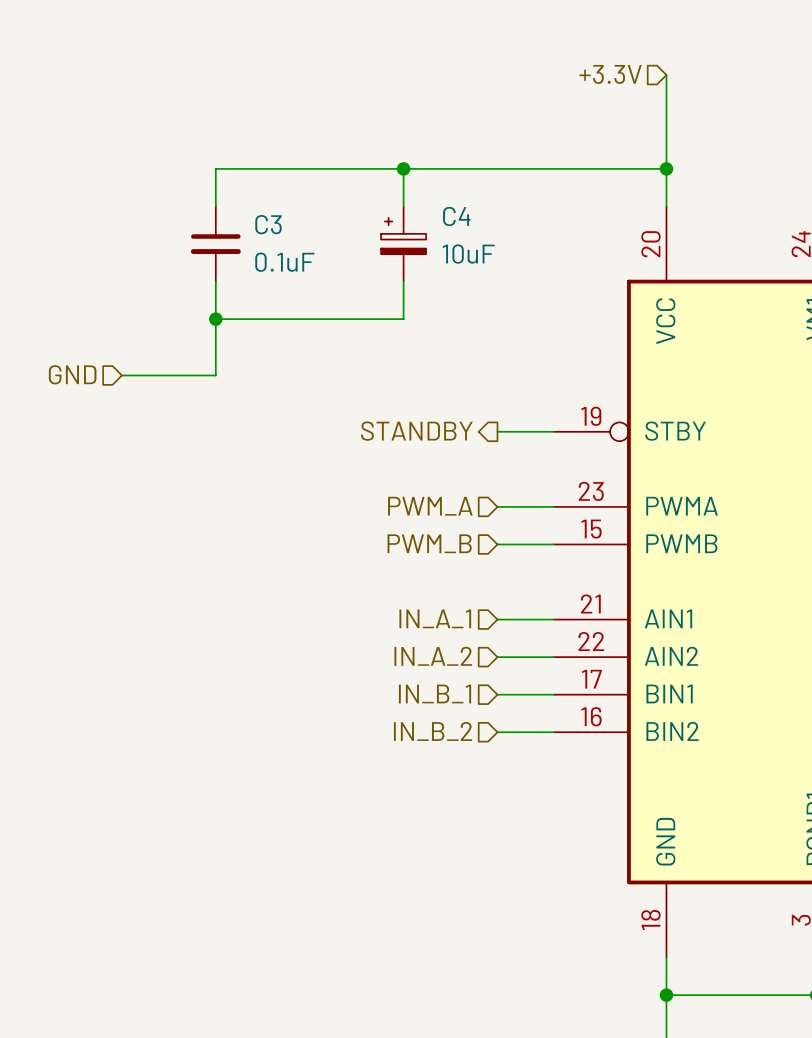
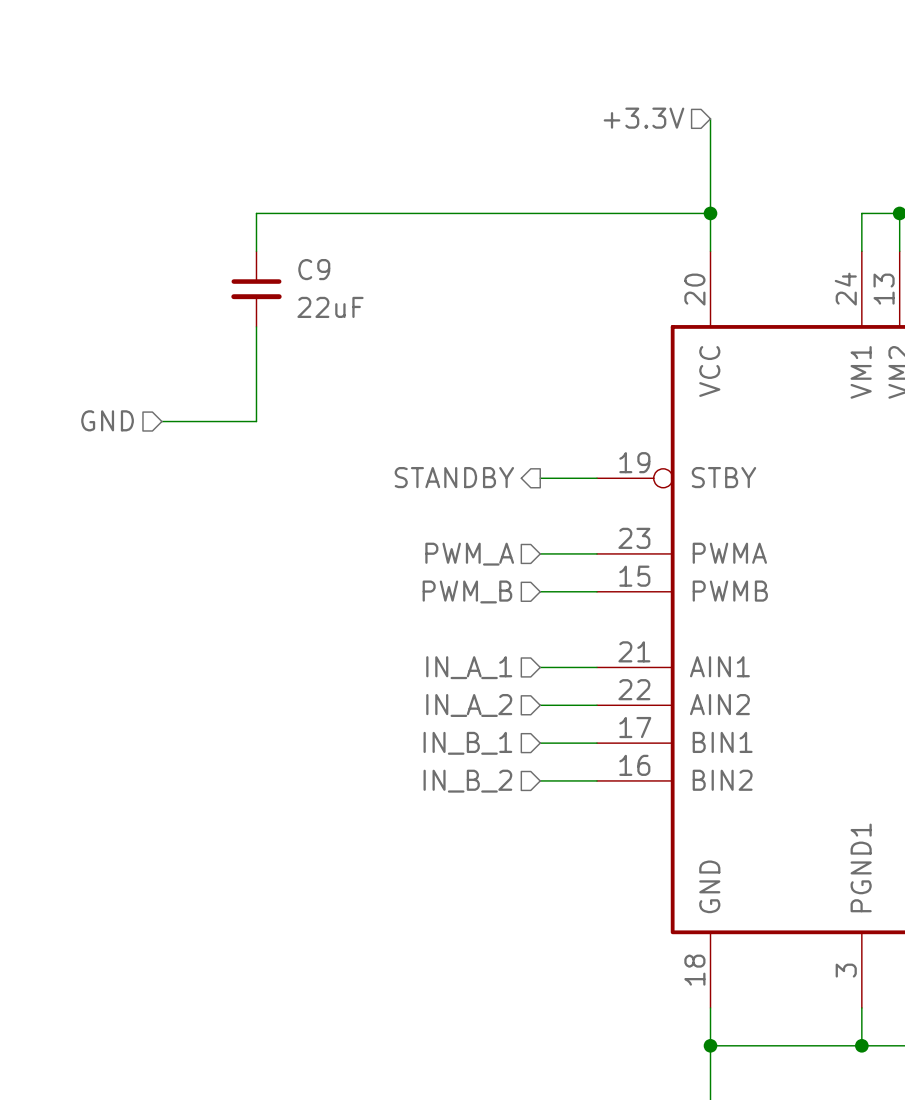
wire: (403, 168) (403, 206) -> none
junction: (403, 168) -> none
C3 name: C3 (268, 224) -> C9 (314, 269)
C4: 10uF (403, 244) -> none
C3 value: 0.1uF (284, 262) -> 22uF (330, 307)
wire: (403, 281) (403, 319) (215, 319) -> none
junction: (215, 319) -> none

